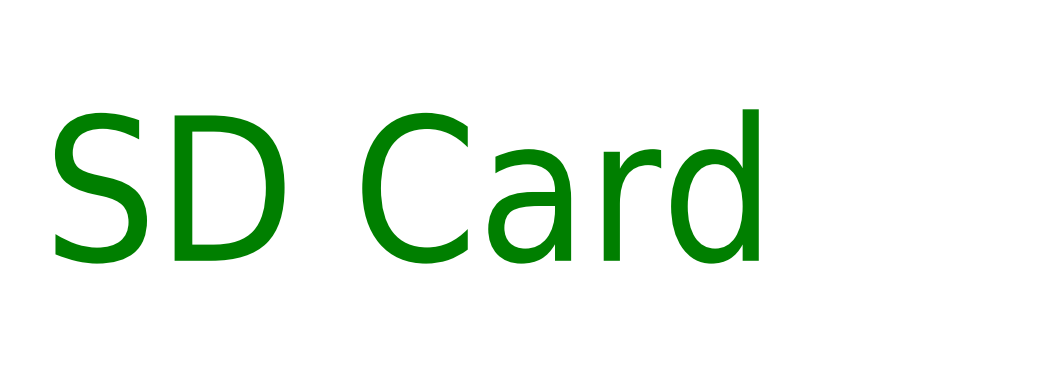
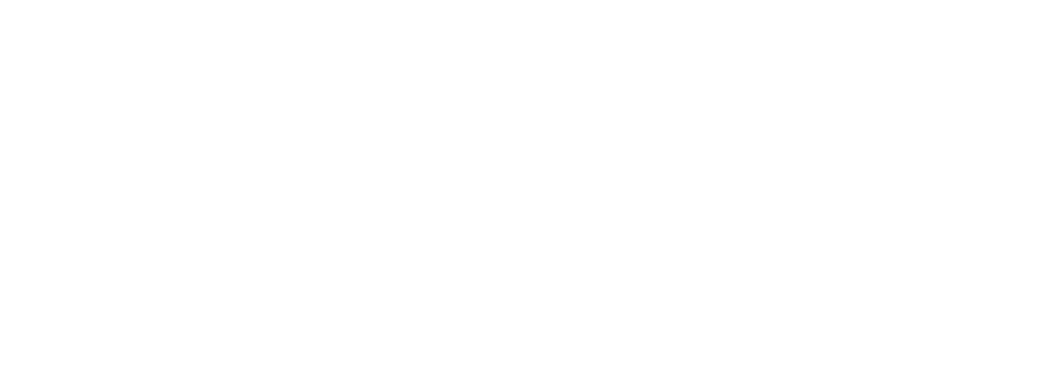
text: SD Card (406, 186) -> none

